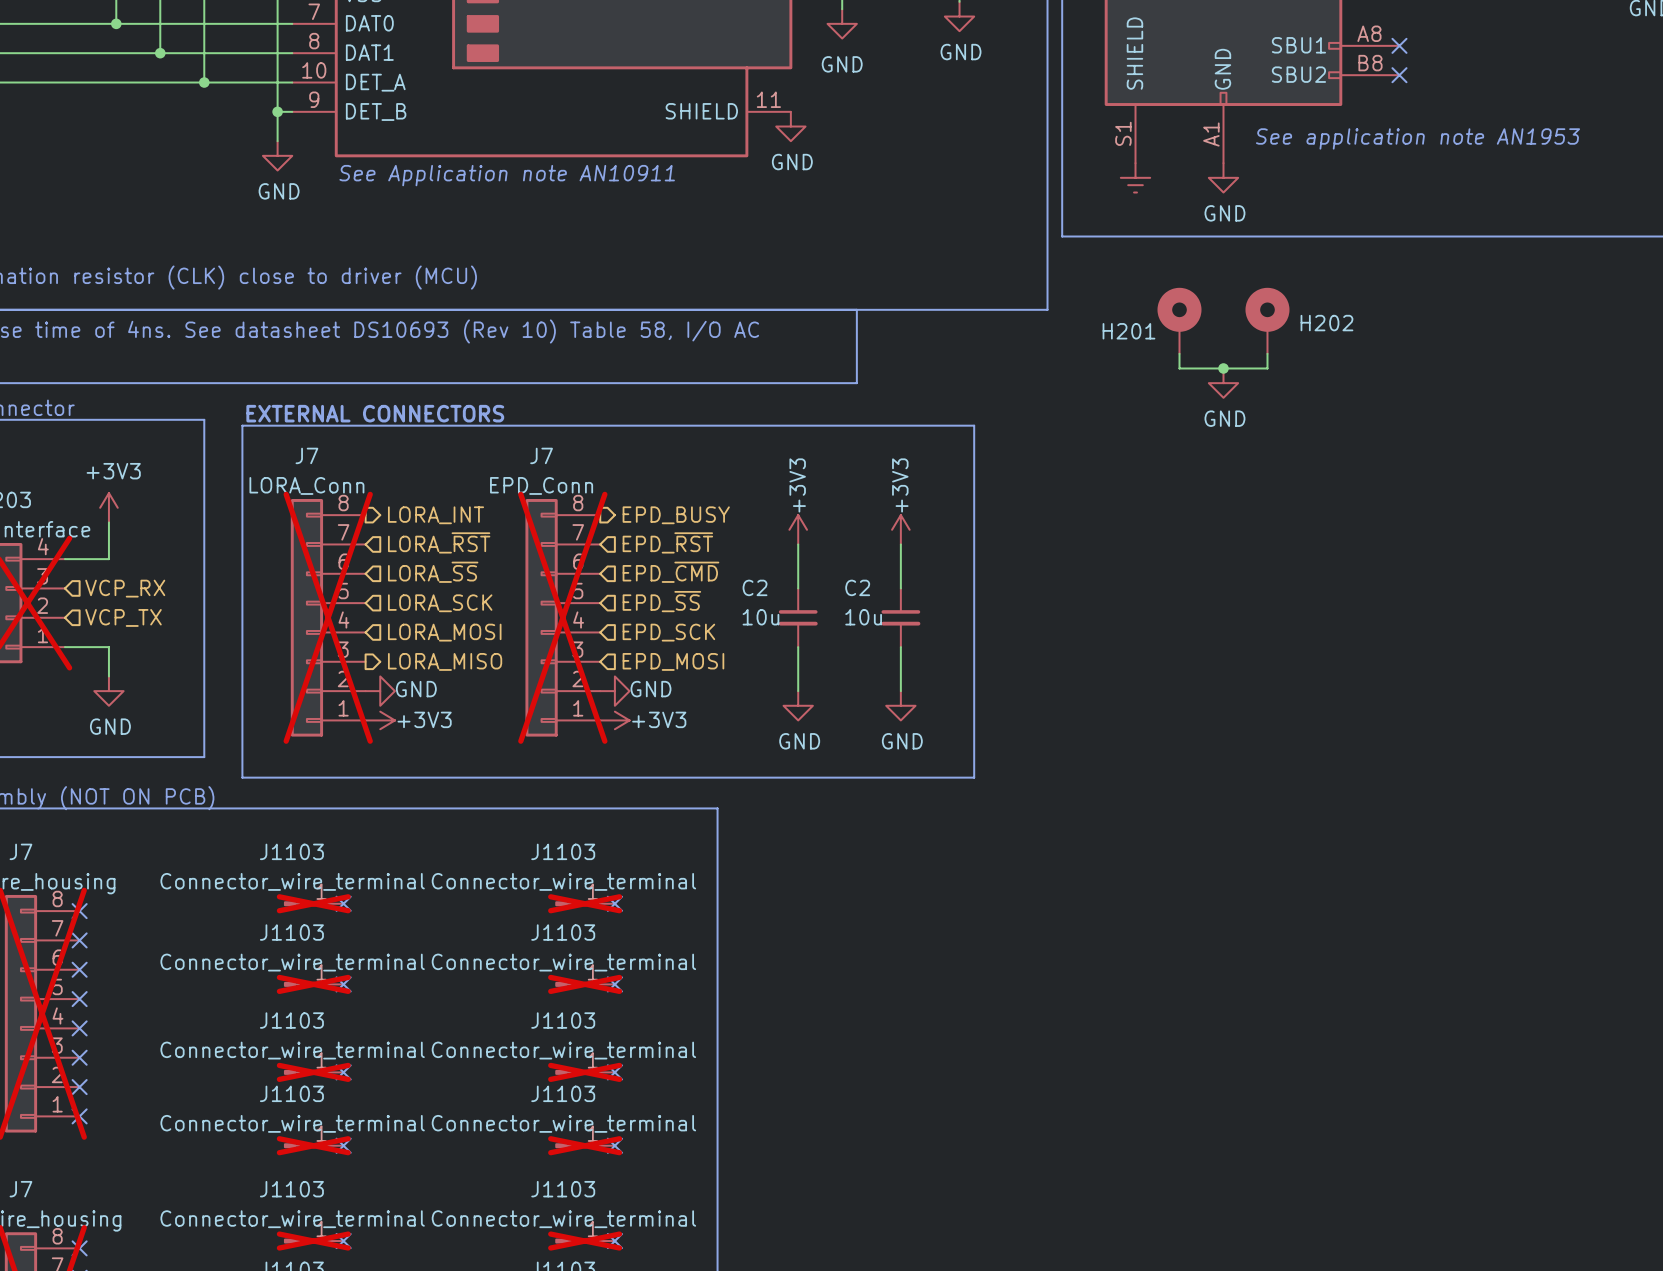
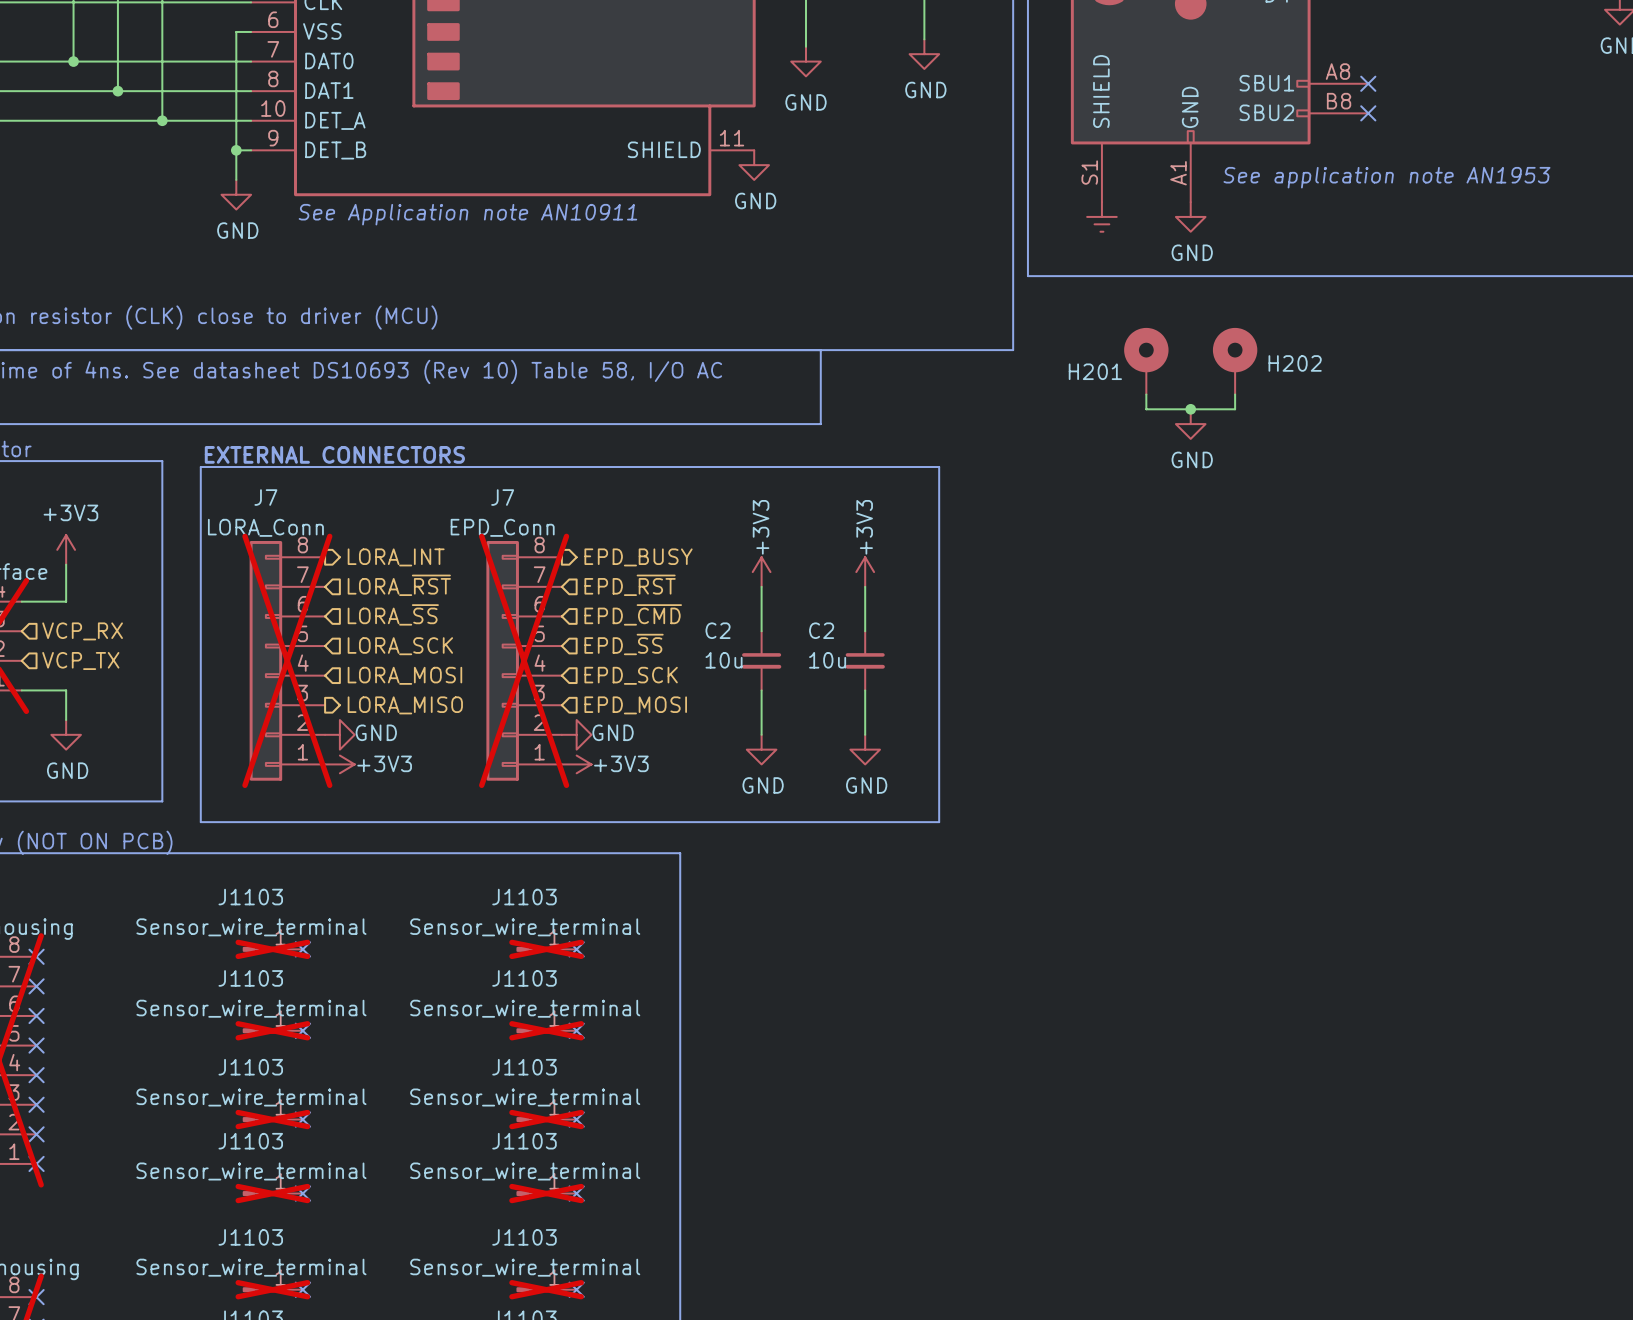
J1103 value: Connector_wire_terminal (292, 881) -> Sensor_wire_terminal (251, 927)
J1103 value: Connector_wire_terminal (563, 881) -> Sensor_wire_terminal (525, 927)
J1103 value: Connector_wire_terminal (292, 962) -> Sensor_wire_terminal (251, 1008)
J1103 value: Connector_wire_terminal (563, 962) -> Sensor_wire_terminal (525, 1008)
J1103 value: Connector_wire_terminal (292, 1050) -> Sensor_wire_terminal (251, 1097)
J1103 value: Connector_wire_terminal (563, 1050) -> Sensor_wire_terminal (525, 1097)
J1103 value: Connector_wire_terminal (292, 1123) -> Sensor_wire_terminal (251, 1171)
J1103 value: Connector_wire_terminal (563, 1123) -> Sensor_wire_terminal (525, 1171)
J1103 value: Connector_wire_terminal (292, 1219) -> Sensor_wire_terminal (251, 1267)
J1103 value: Connector_wire_terminal (563, 1219) -> Sensor_wire_terminal (525, 1267)

